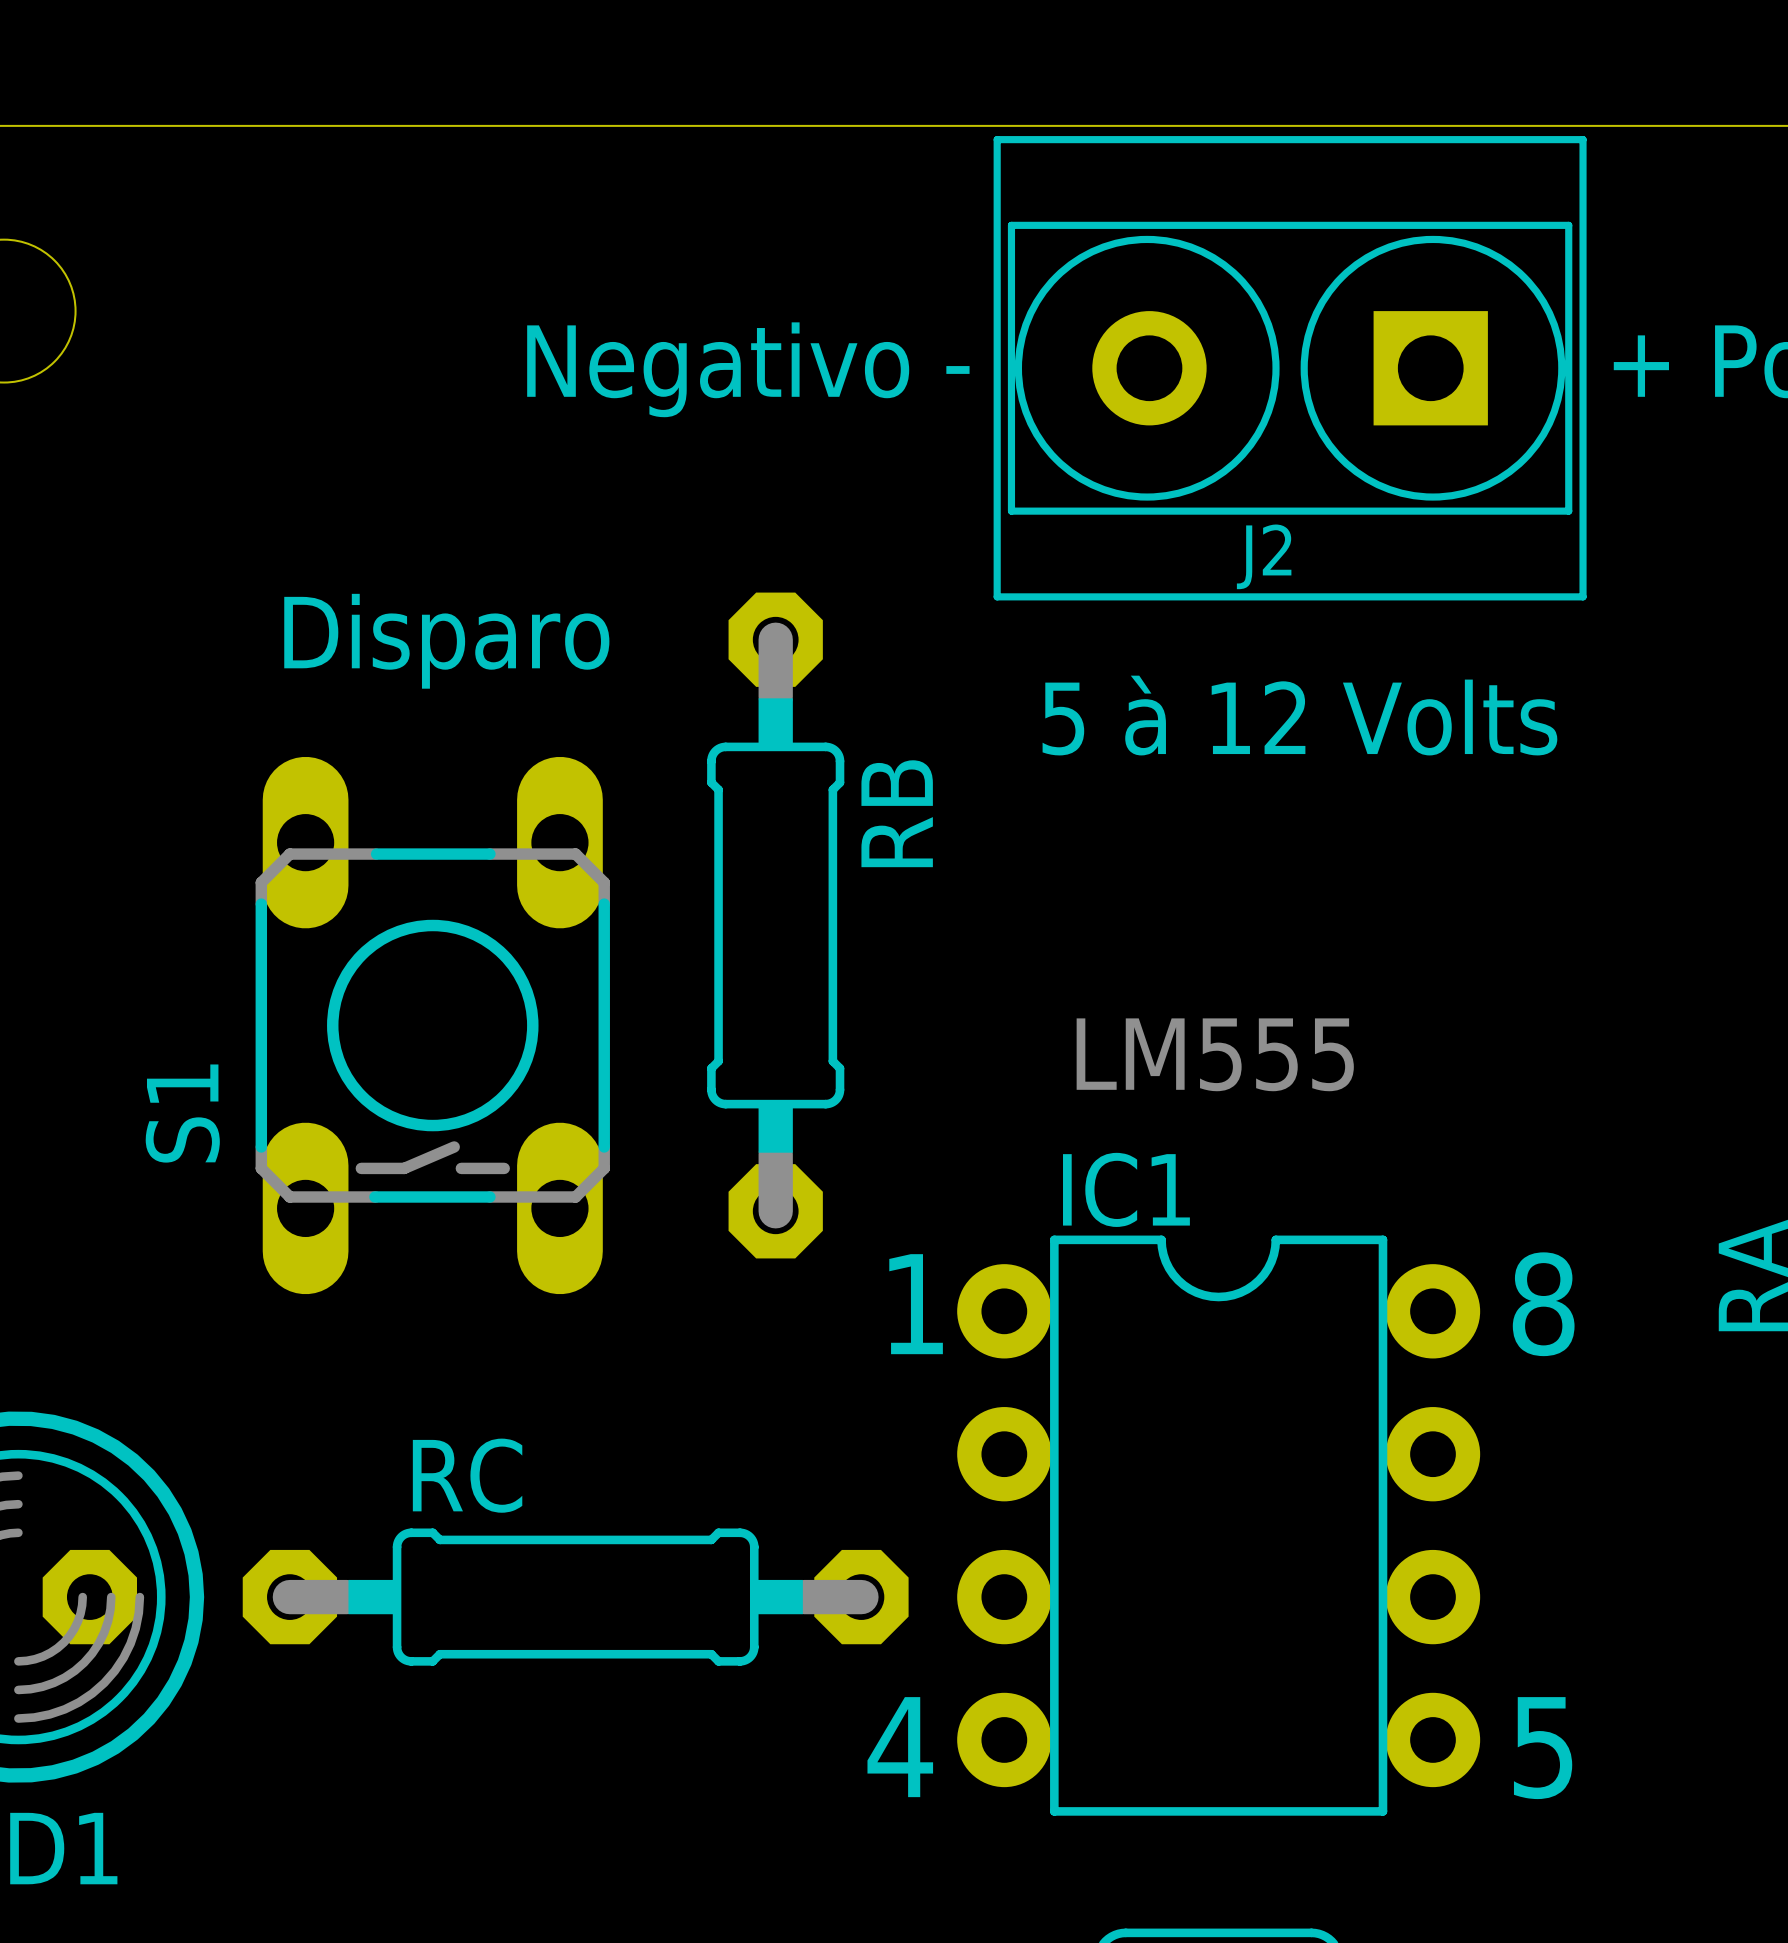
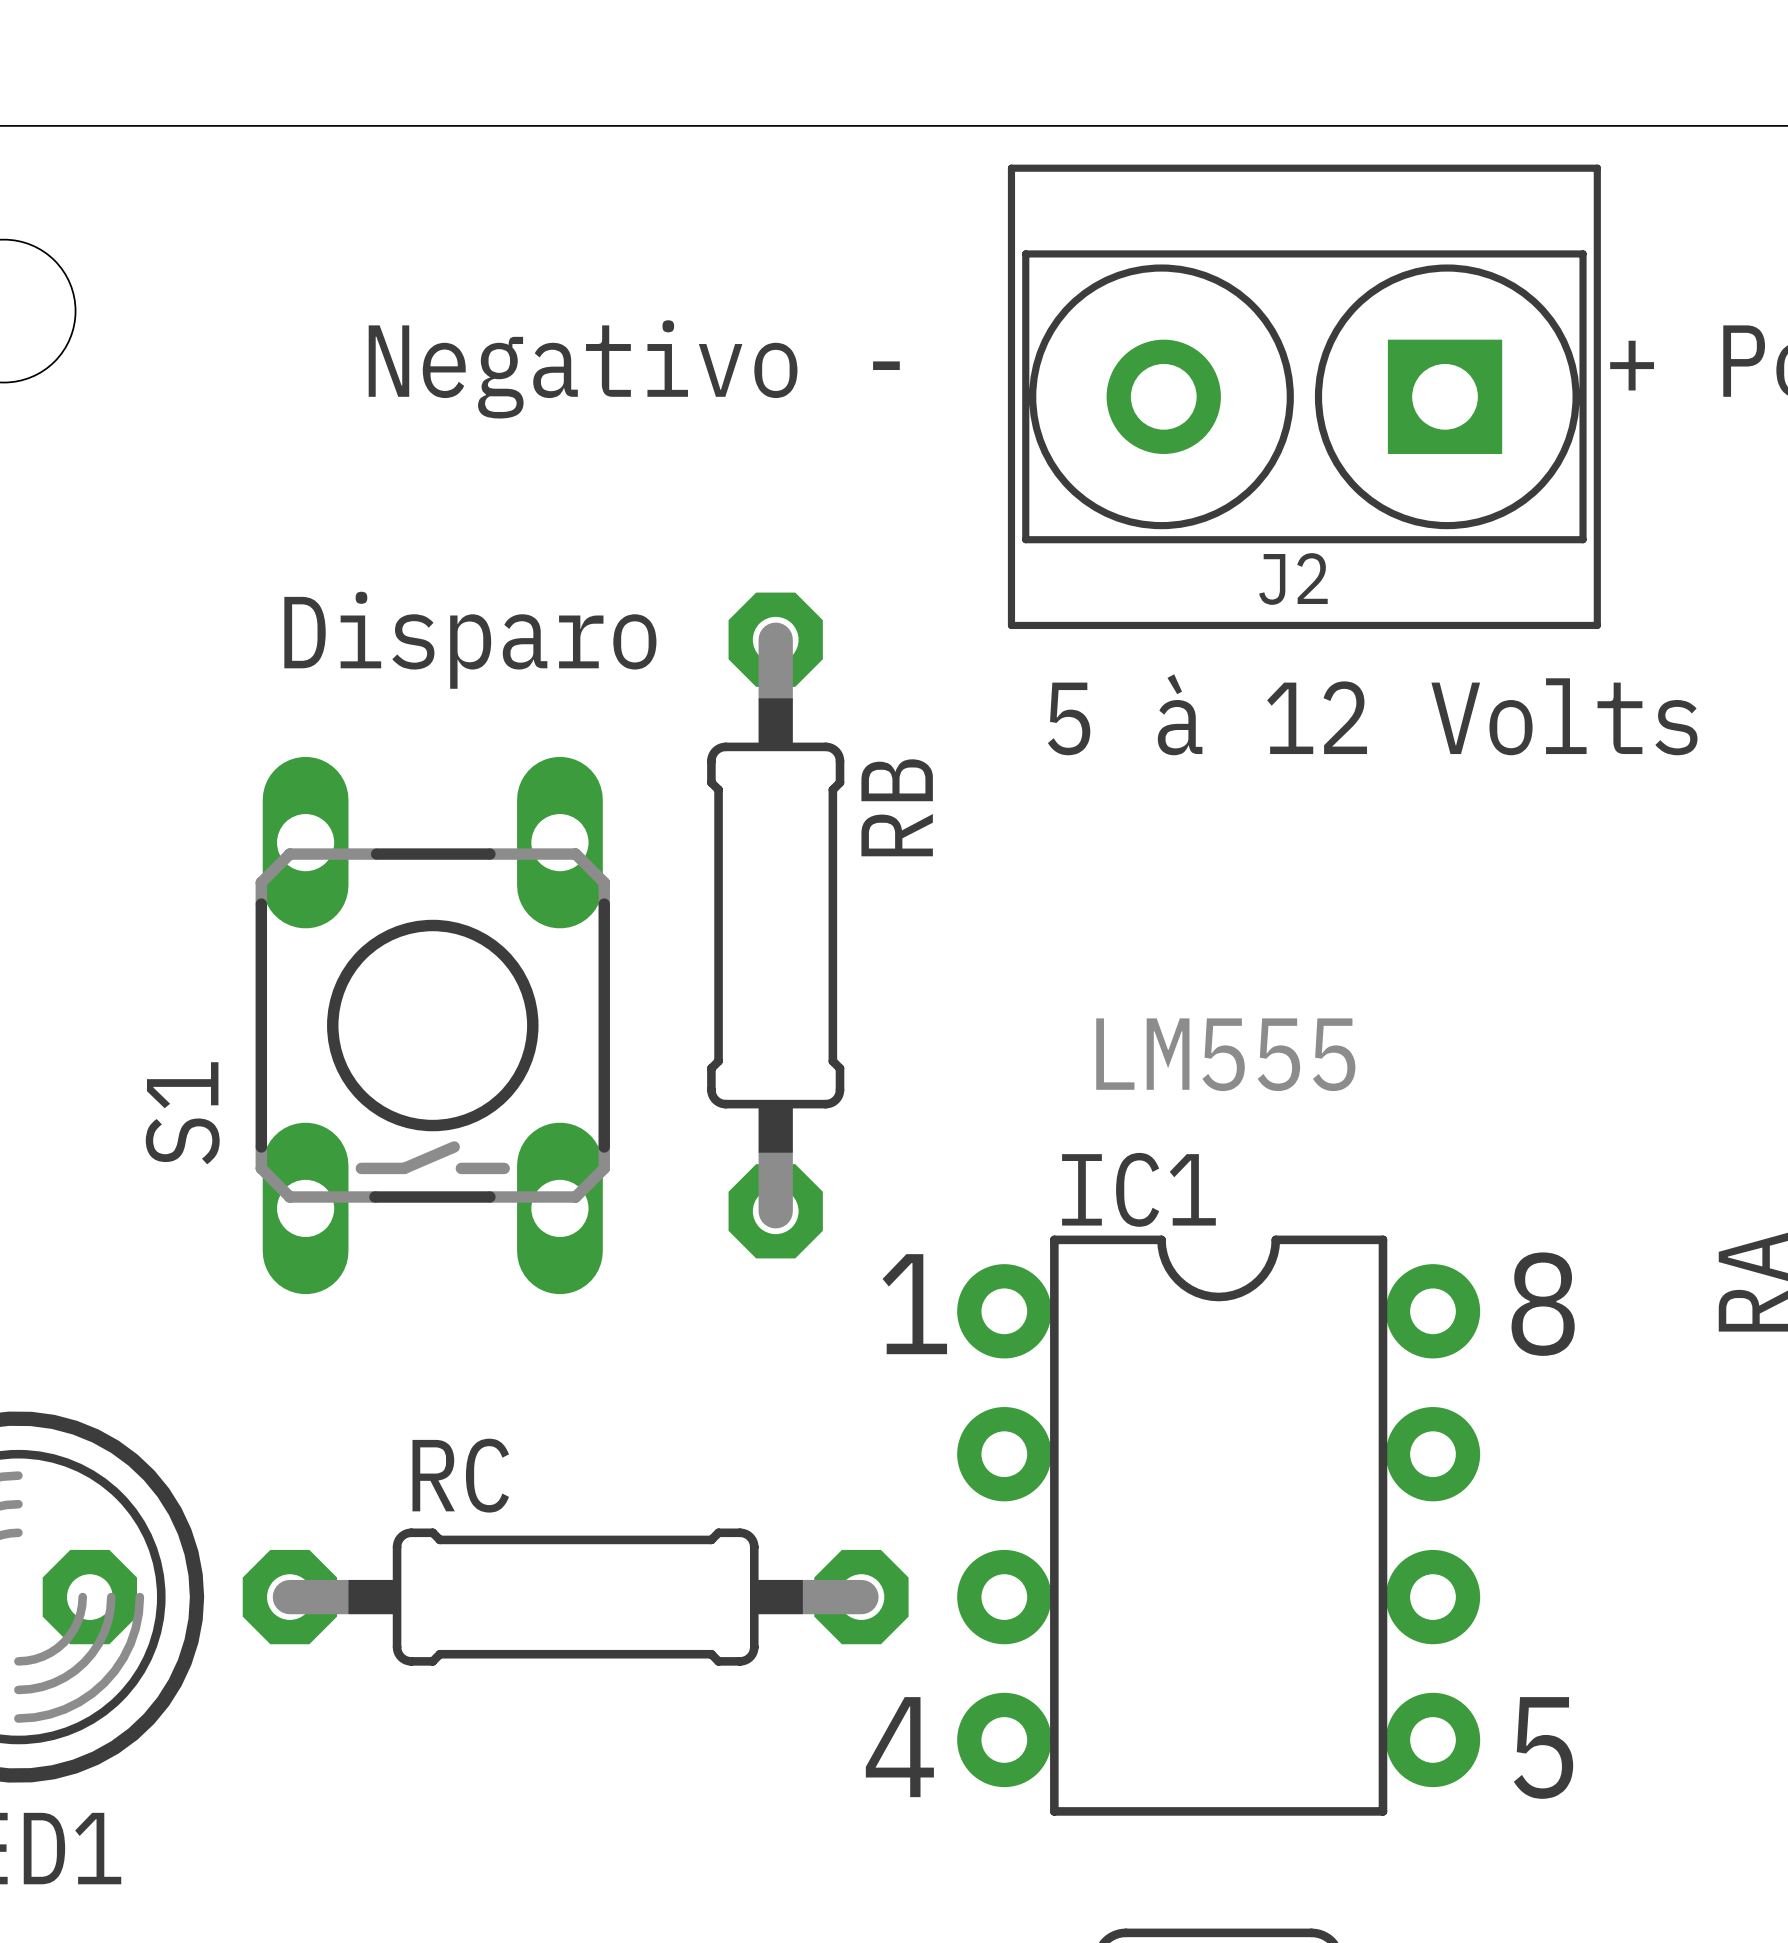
J2 position: (1290, 368) -> (1304, 396)
text position: Negativo - (748, 369) -> Negativo - (634, 369)
text position: 5 à 12 Volts (1299, 715) -> 5 à 12 Volts (1372, 714)

